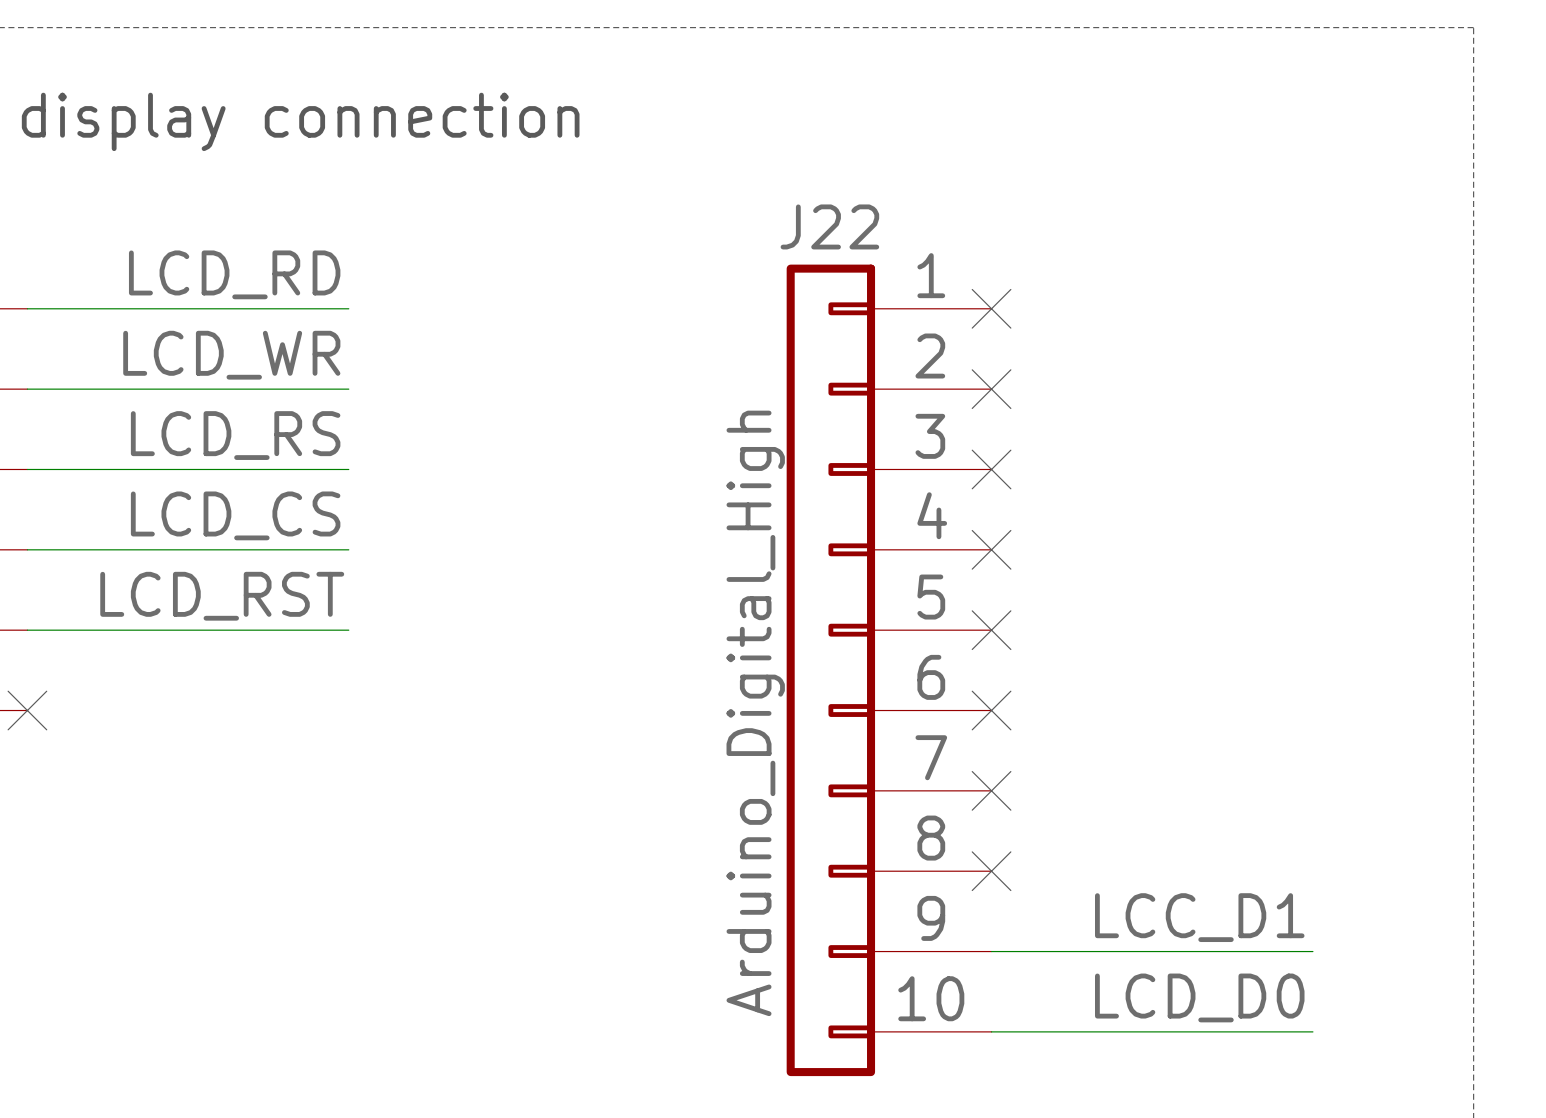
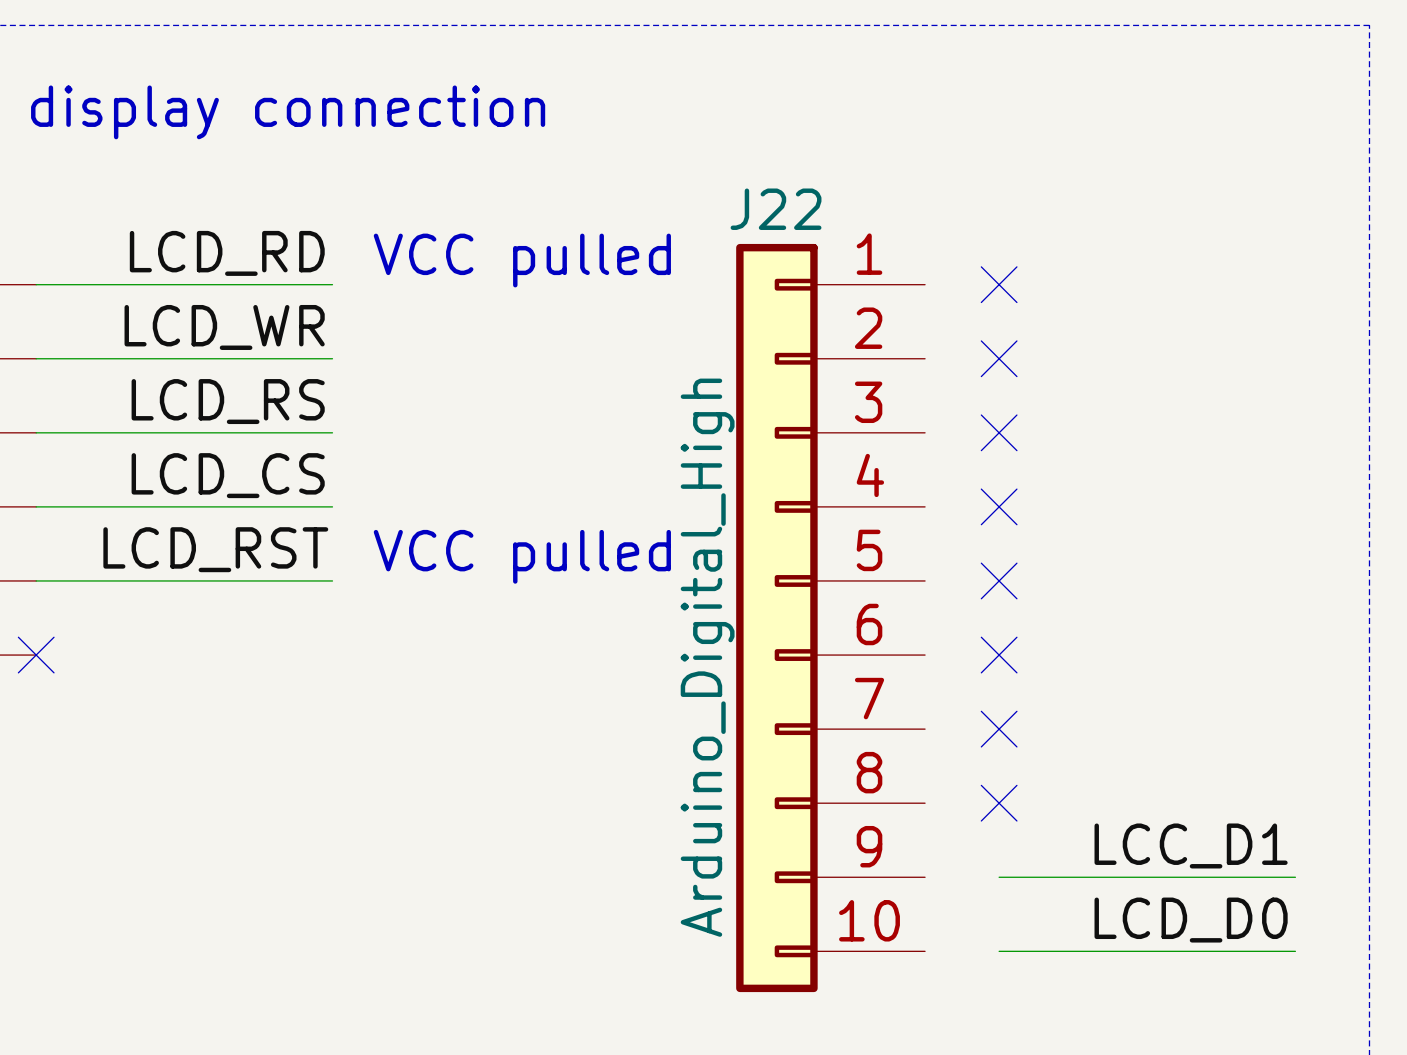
text: none -> VCC pulled (522, 260)
no-connect mark: (991, 308) -> none
no-connect mark: none -> (999, 284)
no-connect mark: (991, 389) -> none
no-connect mark: none -> (999, 358)
no-connect mark: (991, 469) -> none
no-connect mark: none -> (999, 432)
no-connect mark: (991, 549) -> none
no-connect mark: none -> (999, 506)
text: none -> VCC pulled (522, 556)
no-connect mark: (991, 630) -> none
no-connect mark: none -> (999, 580)
no-connect mark: (991, 710) -> none
no-connect mark: none -> (999, 655)
no-connect mark: (991, 790) -> none
no-connect mark: none -> (999, 729)
no-connect mark: (991, 871) -> none
no-connect mark: none -> (999, 803)
label position: LCC_D1 (1199, 917) -> LCC_D1 (1191, 845)
wire: (991, 951) (1071, 951) -> (1221, 877) (1295, 877)
label position: LCD_D0 (1199, 997) -> LCD_D0 (1191, 920)
wire: (991, 1031) (1071, 1031) -> (1221, 951) (1295, 951)

